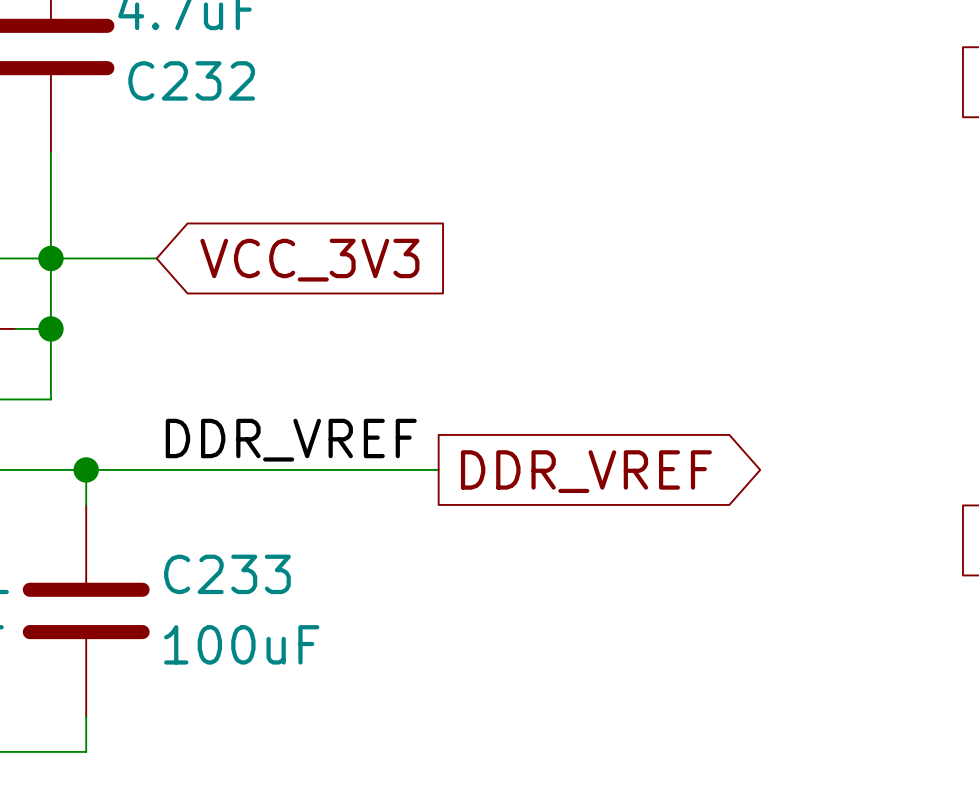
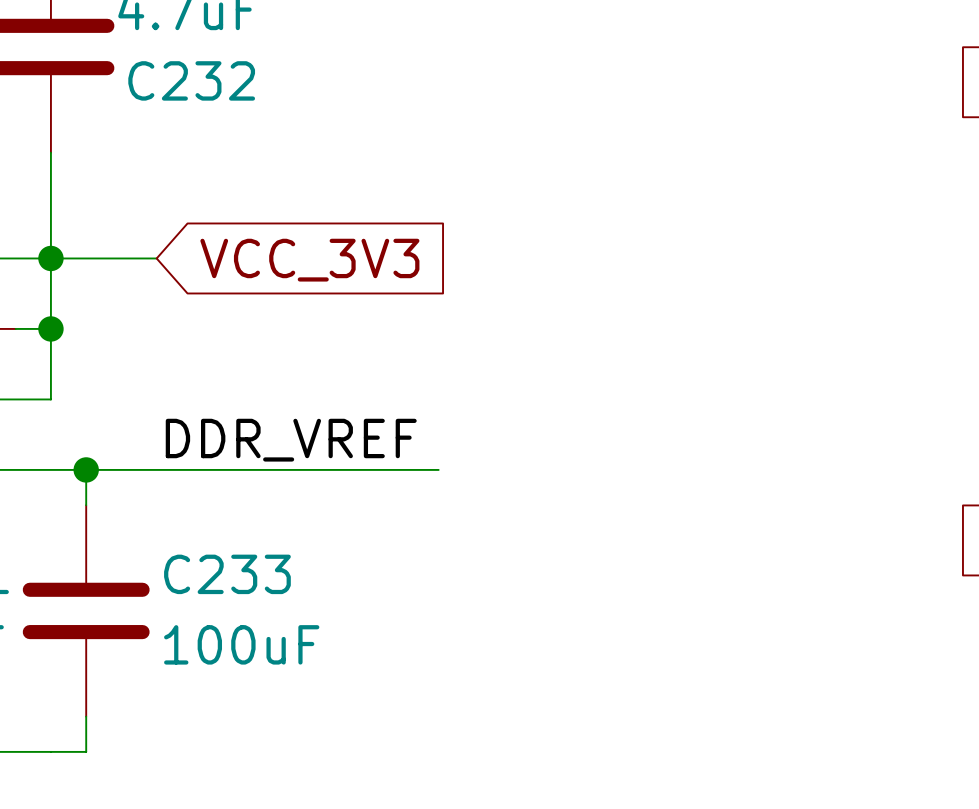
global label: DDR_VREF (586, 471) -> none

